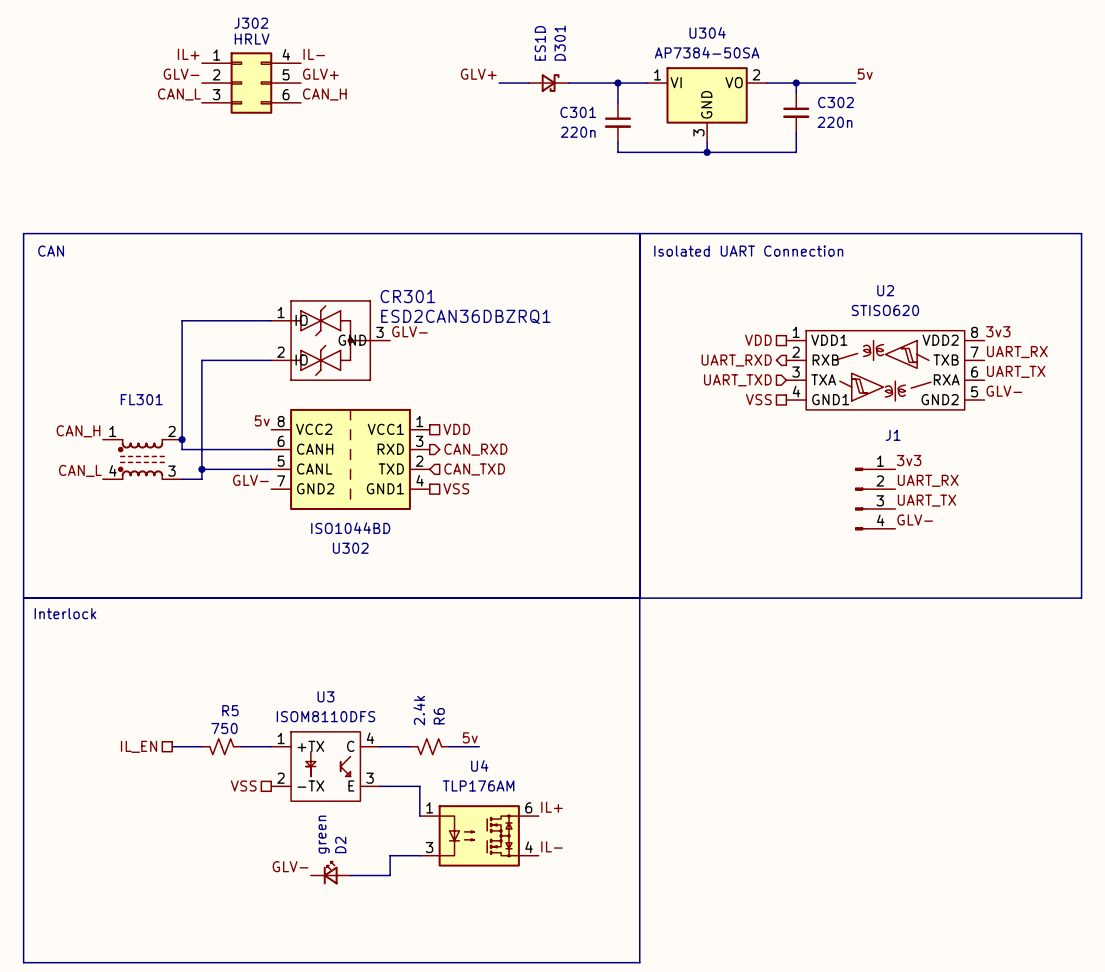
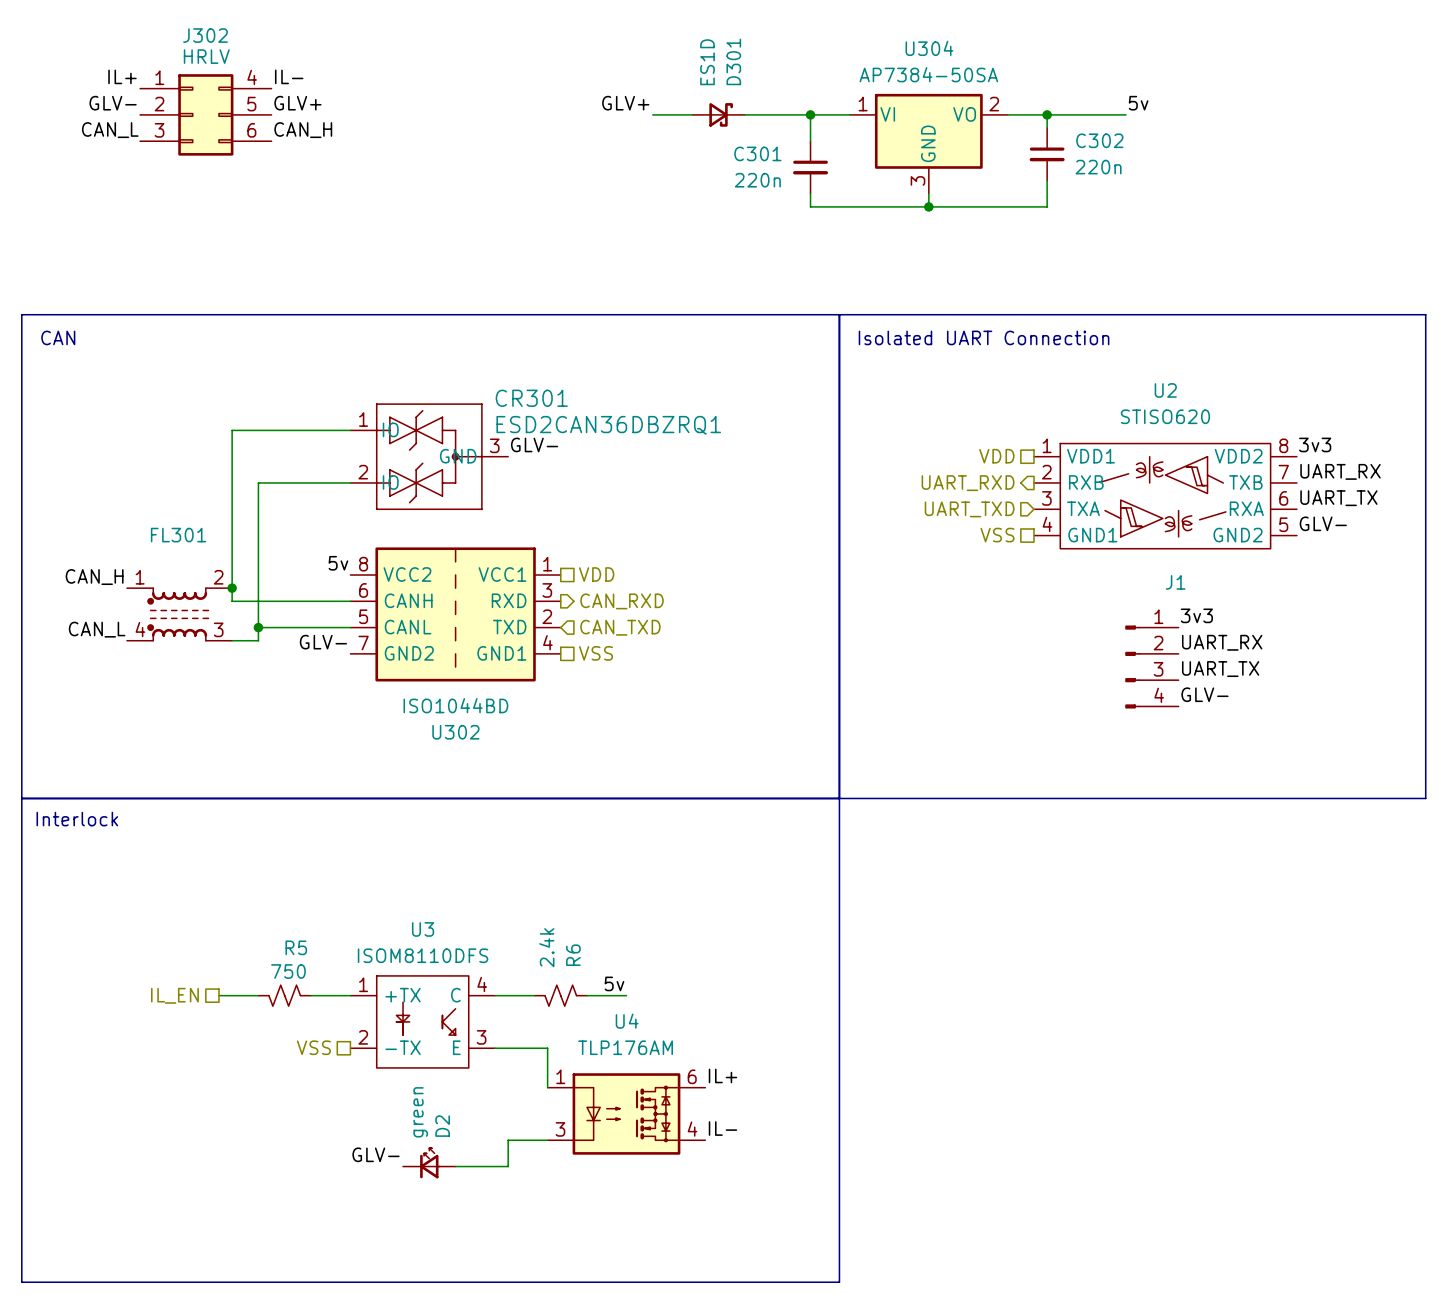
label position: IL+ (188, 54) -> IL+ (122, 76)
label position: IL- (314, 54) -> IL- (289, 76)
label position: GLV- (181, 74) -> GLV- (113, 103)
label position: GLV+ (320, 74) -> GLV+ (297, 103)
J302 position: (251, 83) -> (205, 114)
label position: CAN_L (179, 94) -> CAN_L (110, 130)
label position: CAN_H (324, 94) -> CAN_H (303, 130)

